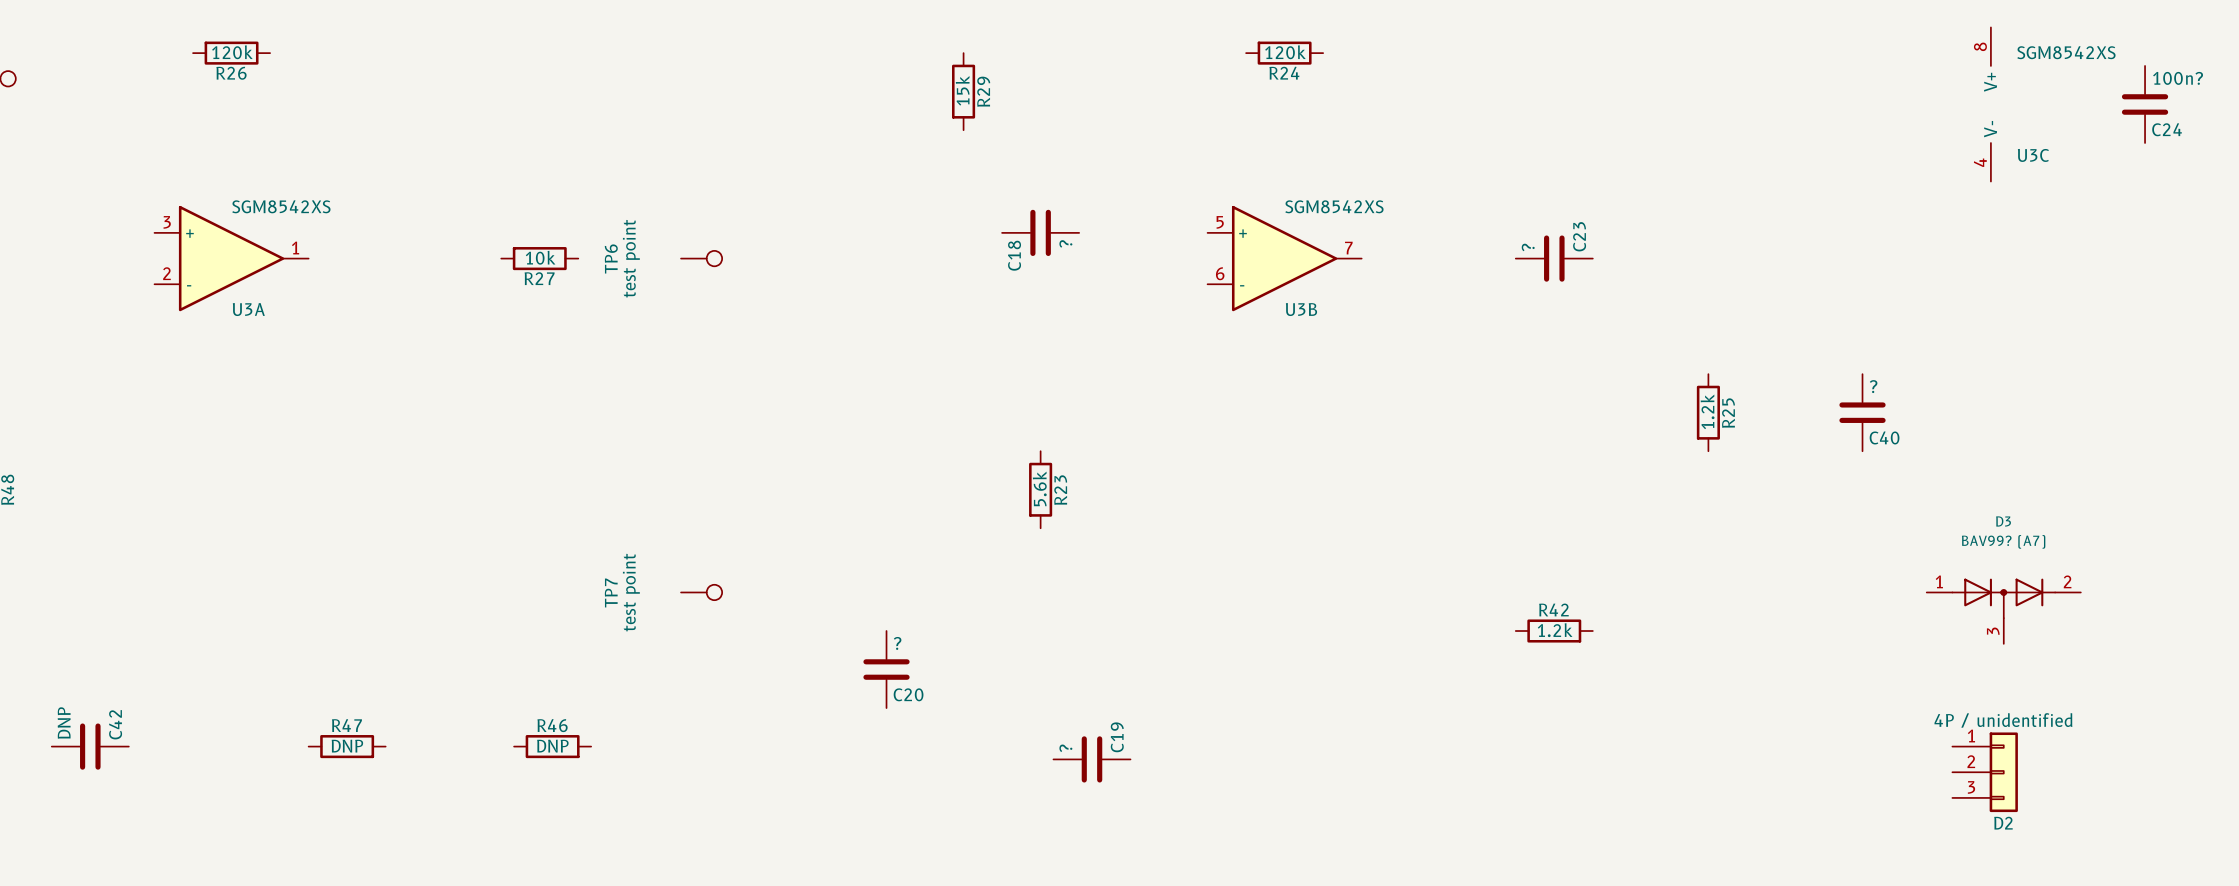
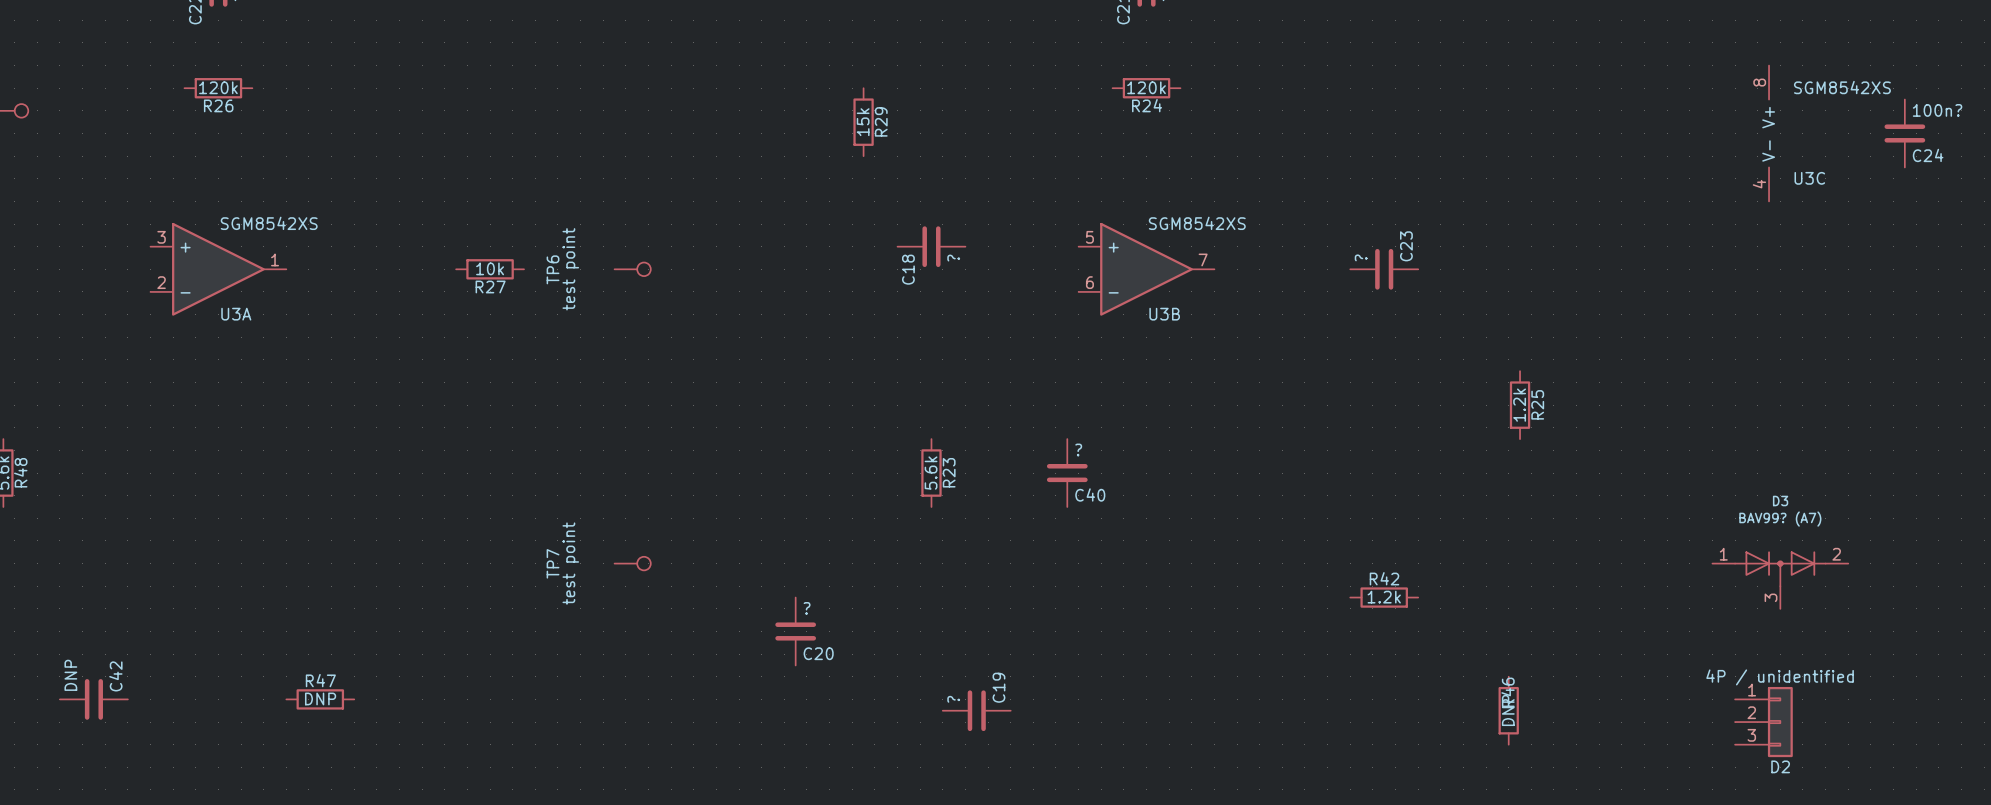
C40 position: (1862, 412) -> (1067, 473)
R46 rotation: 0° (552, 746) -> 90° clockwise (1508, 710)
R46 position: (552, 746) -> (1508, 710)

